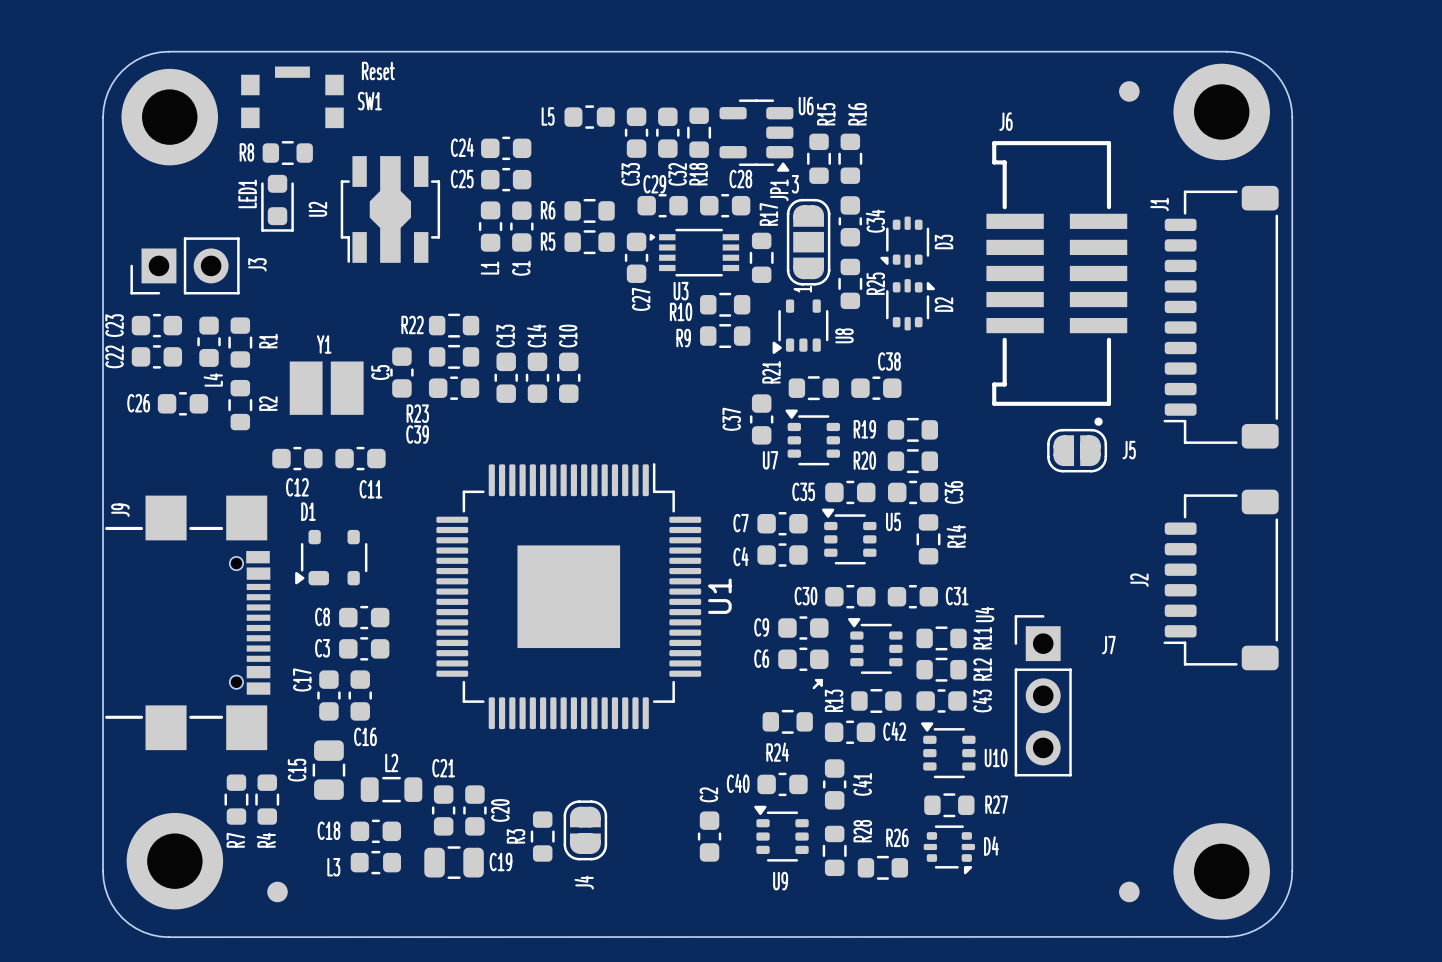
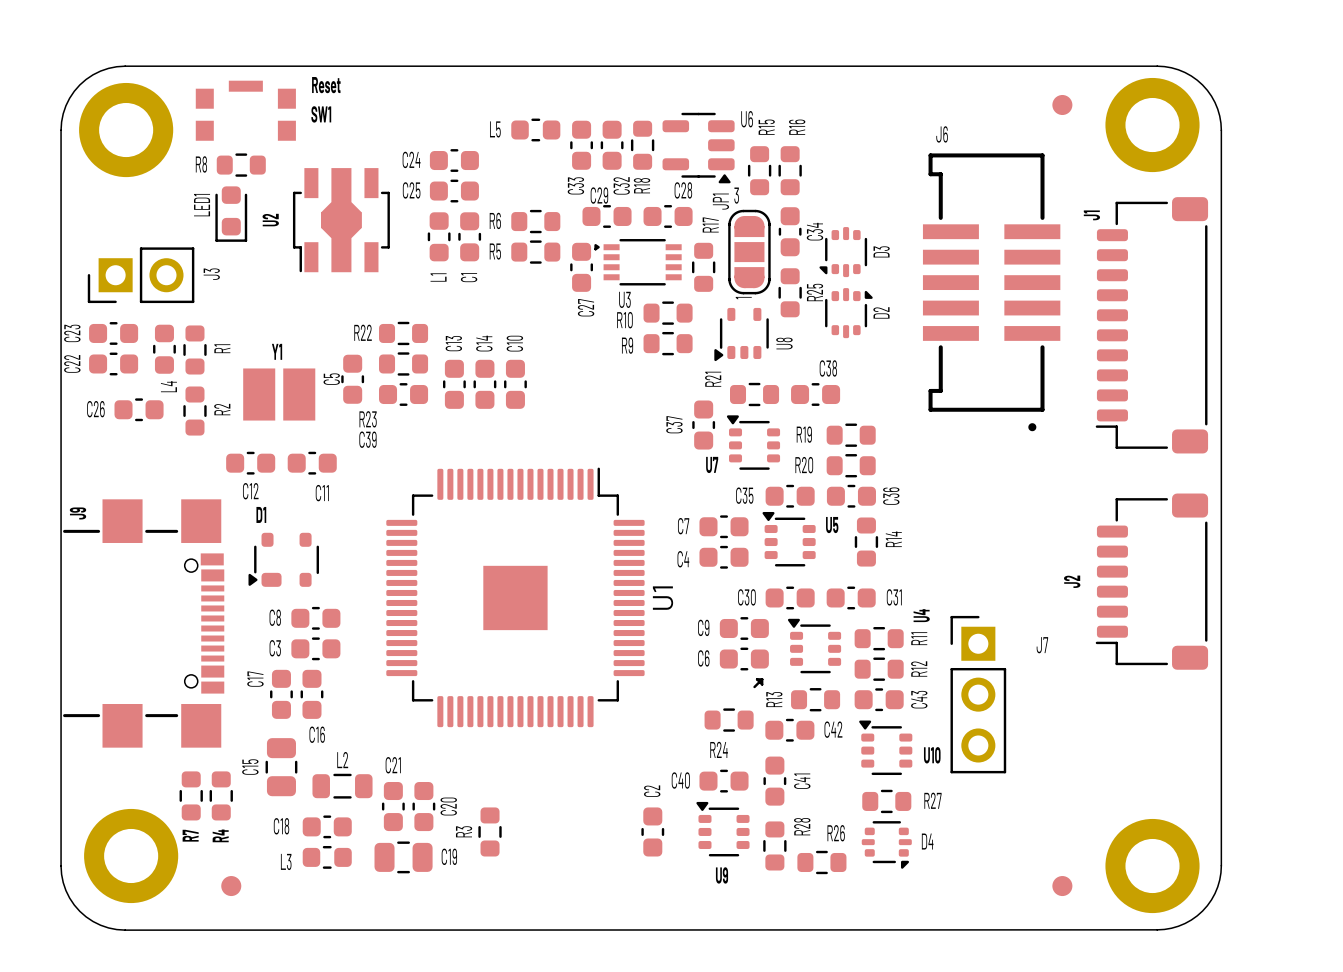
J5: (1077, 450) -> none
U1 footprint: [436, 463, 702, 730] -> [386, 467, 645, 728]
J4: (585, 830) -> none

